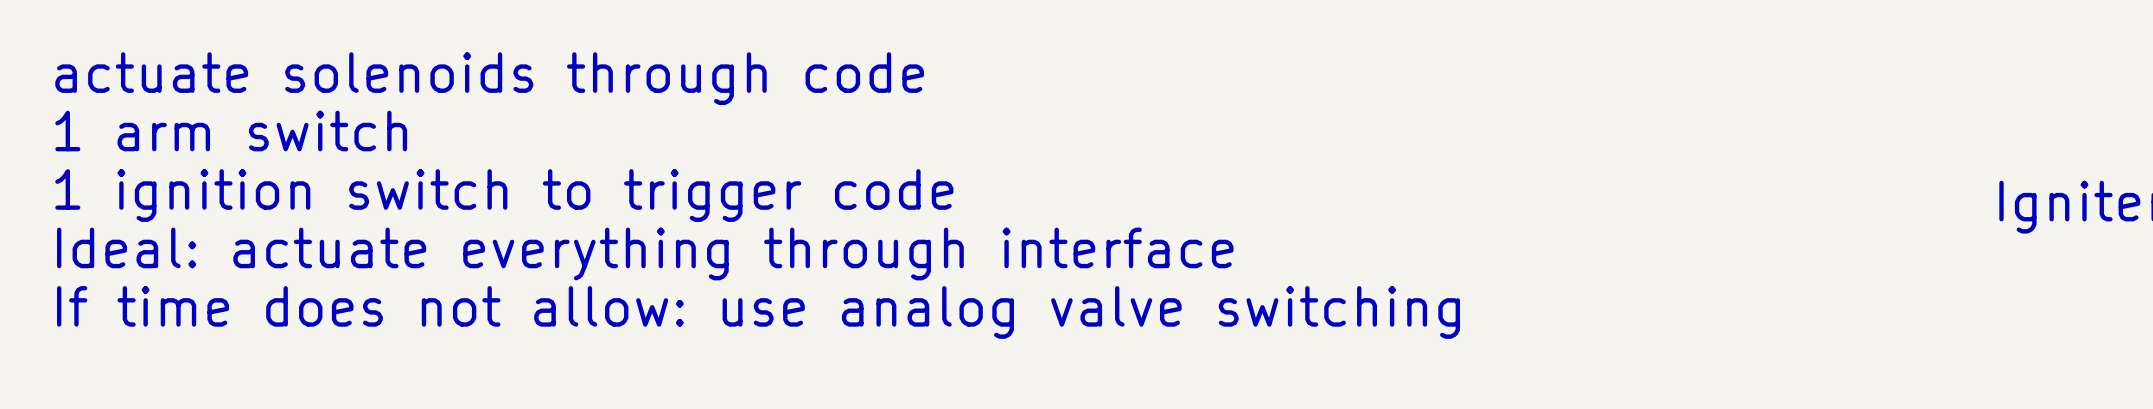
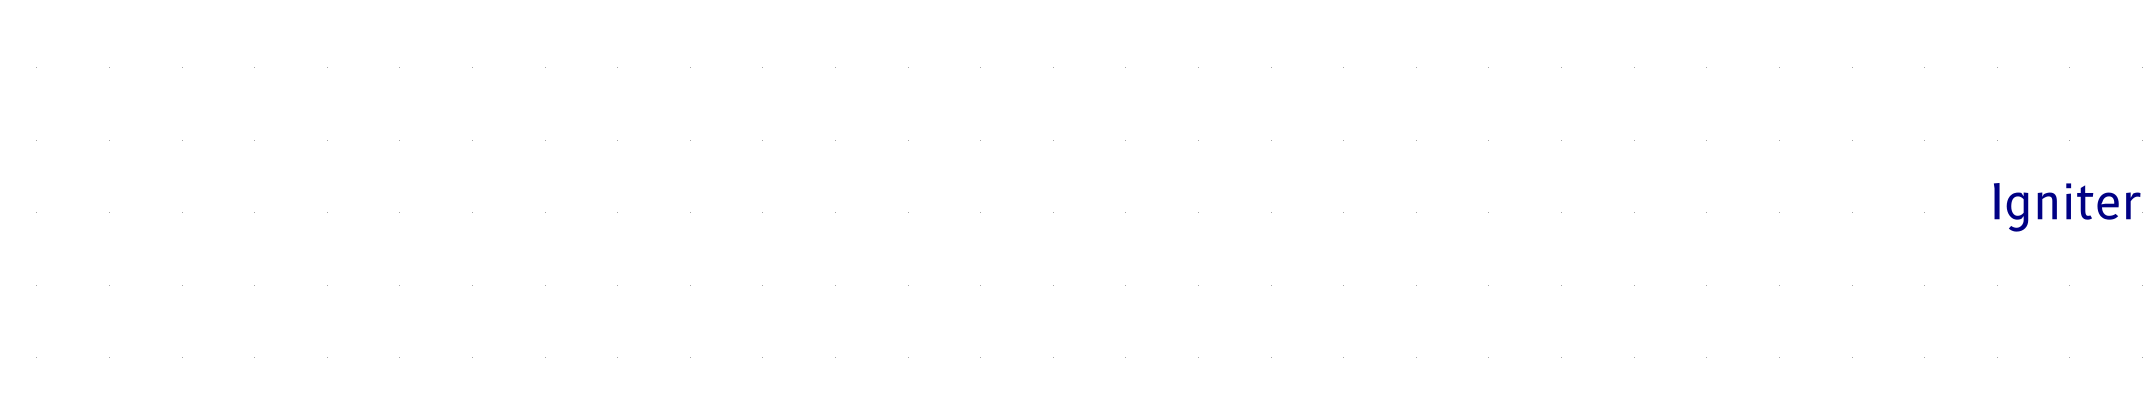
text: actuate solenoids through code (489, 78) -> none
text: 1 arm switch (231, 131) -> none
text: 1 ignition switch to trigger code (504, 195) -> none
text: Ideal: actuate everything through interface (645, 253) -> none
text: If time does not allow: use analog valve switching (758, 312) -> none

